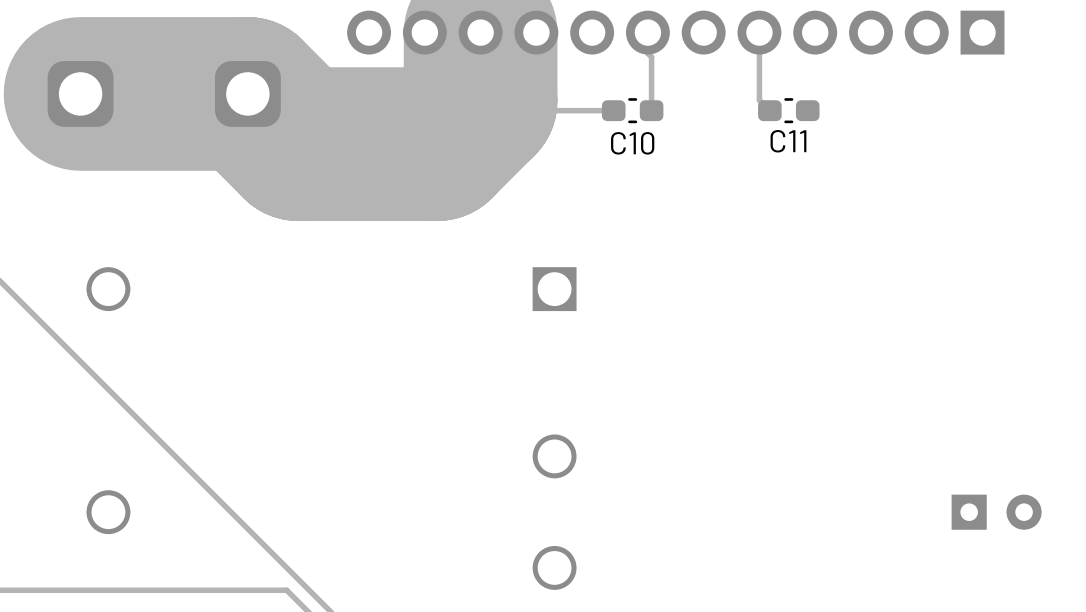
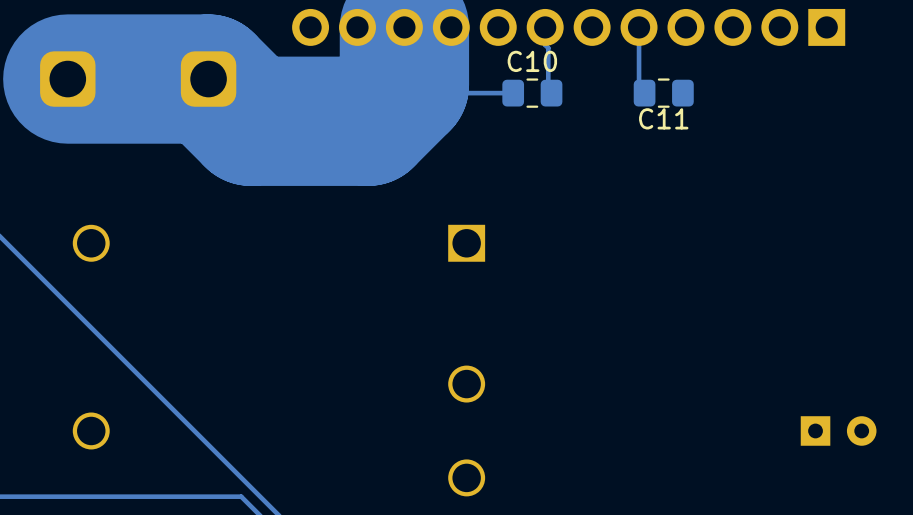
C10 footprint: [601, 98, 664, 124] -> [502, 78, 563, 108]
C11 footprint: [758, 98, 820, 124] -> [633, 78, 694, 108]
C10 name position: C10 (632, 143) -> C10 (532, 61)

